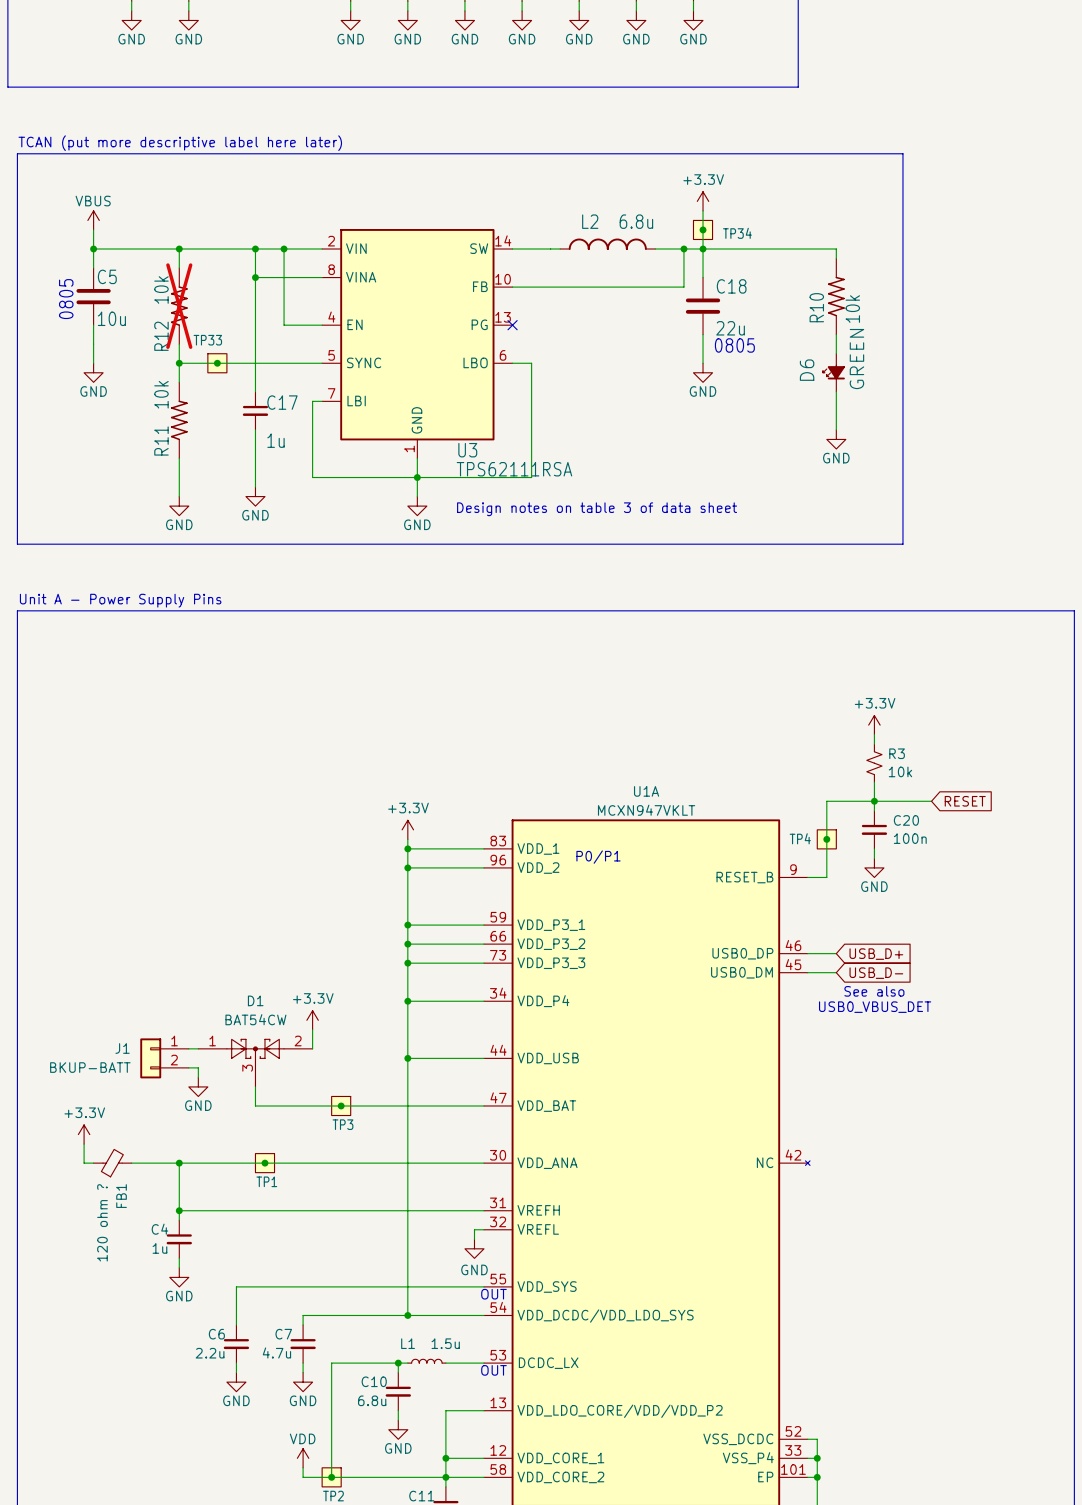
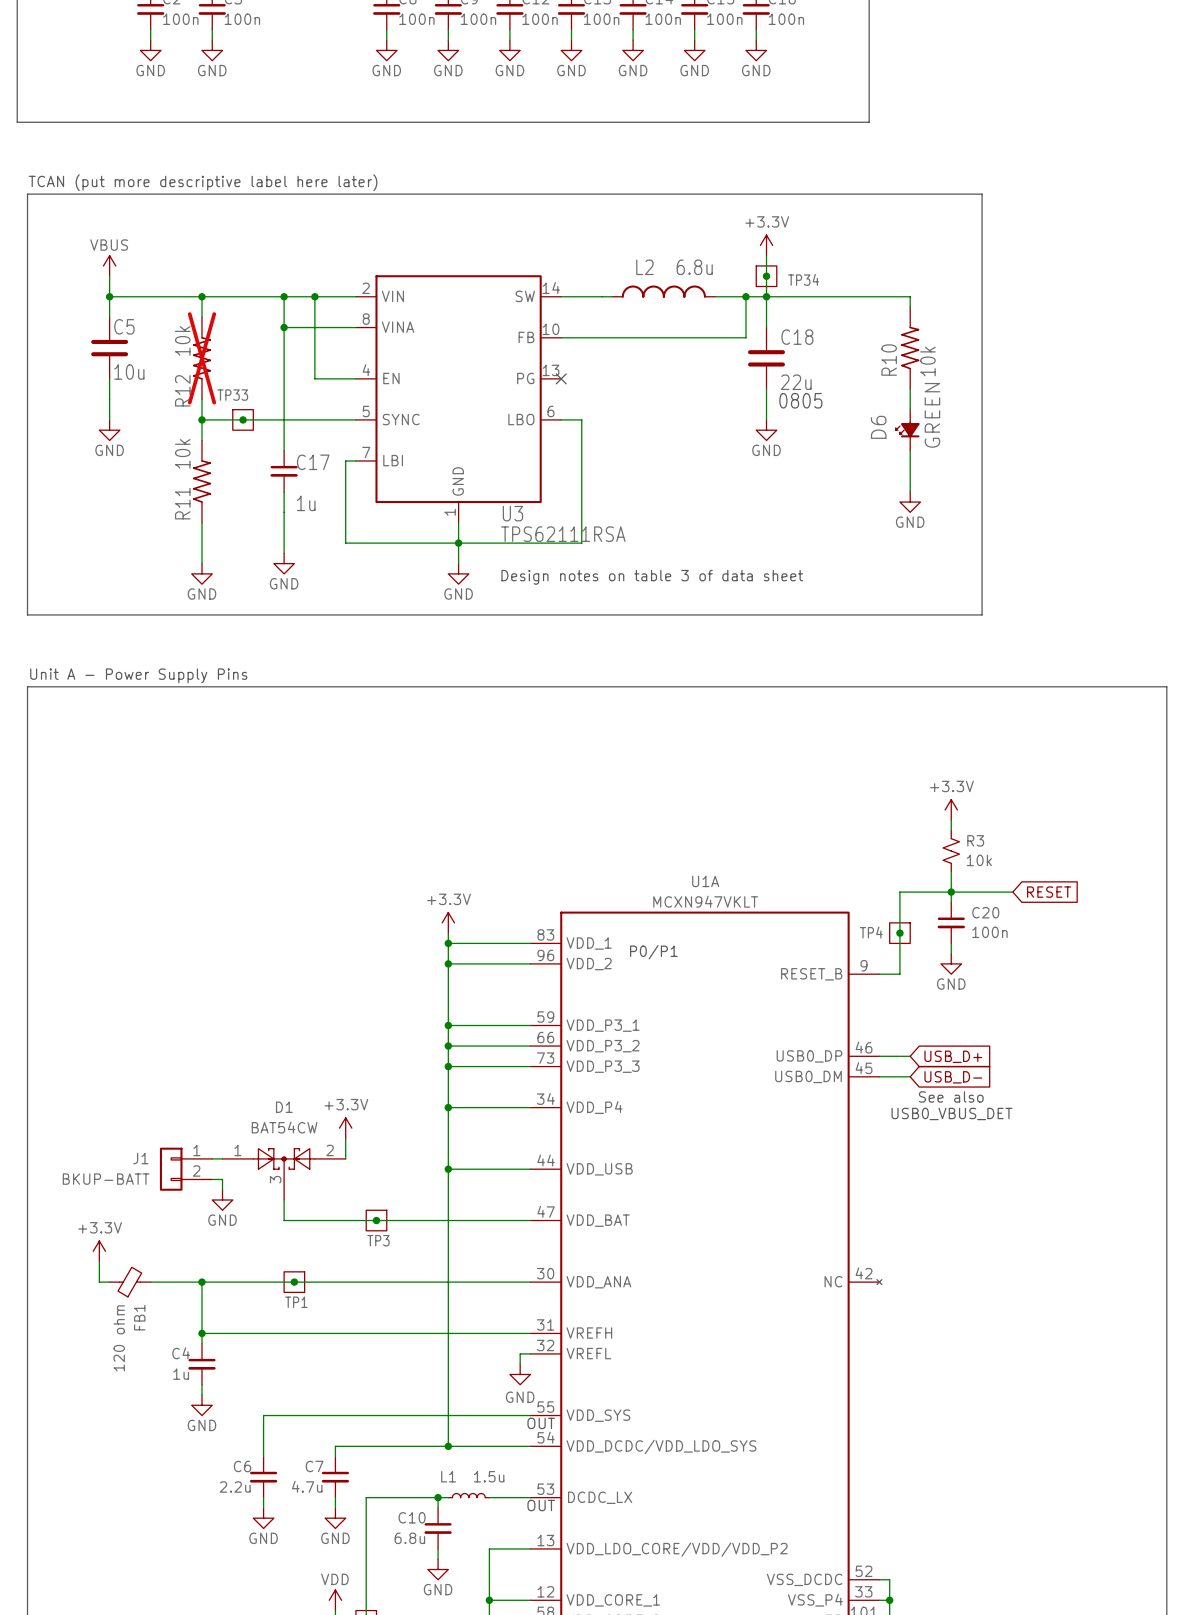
text: 0805 (66, 299) -> none
FB1 value: 120 ohm ? (102, 1222) -> 120 ohm (119, 1338)

